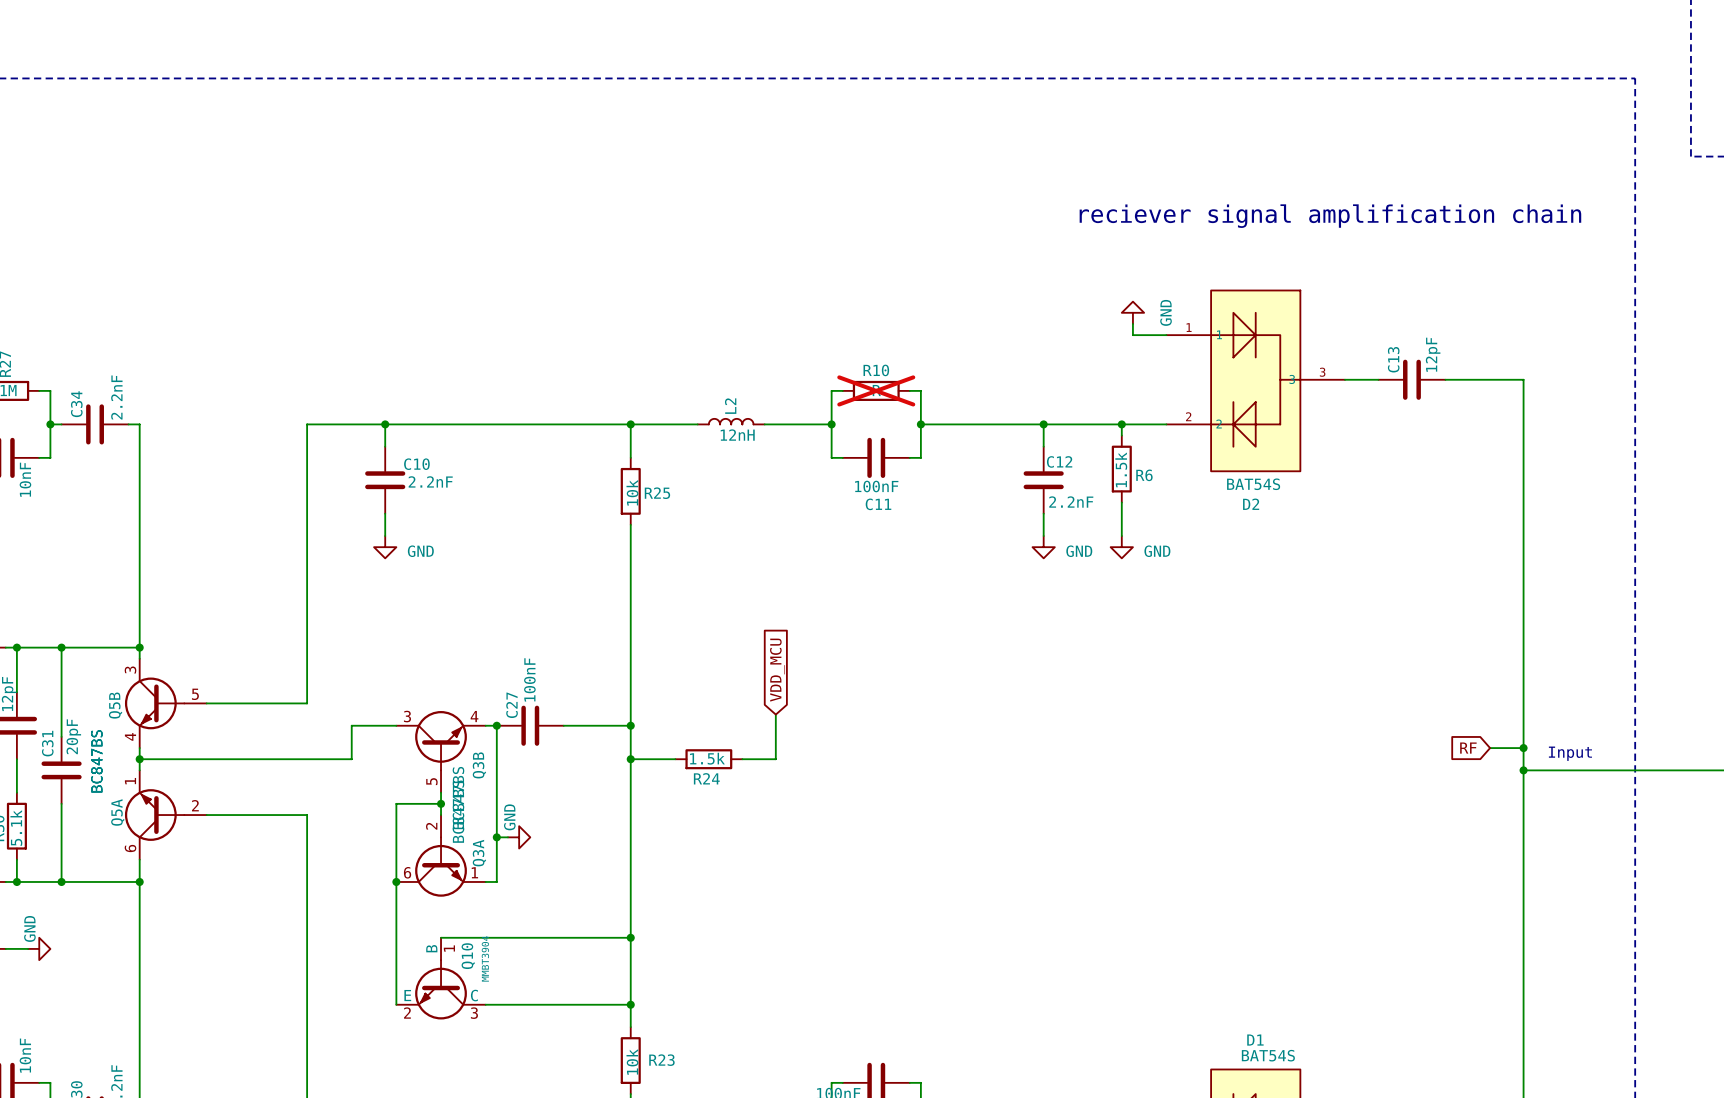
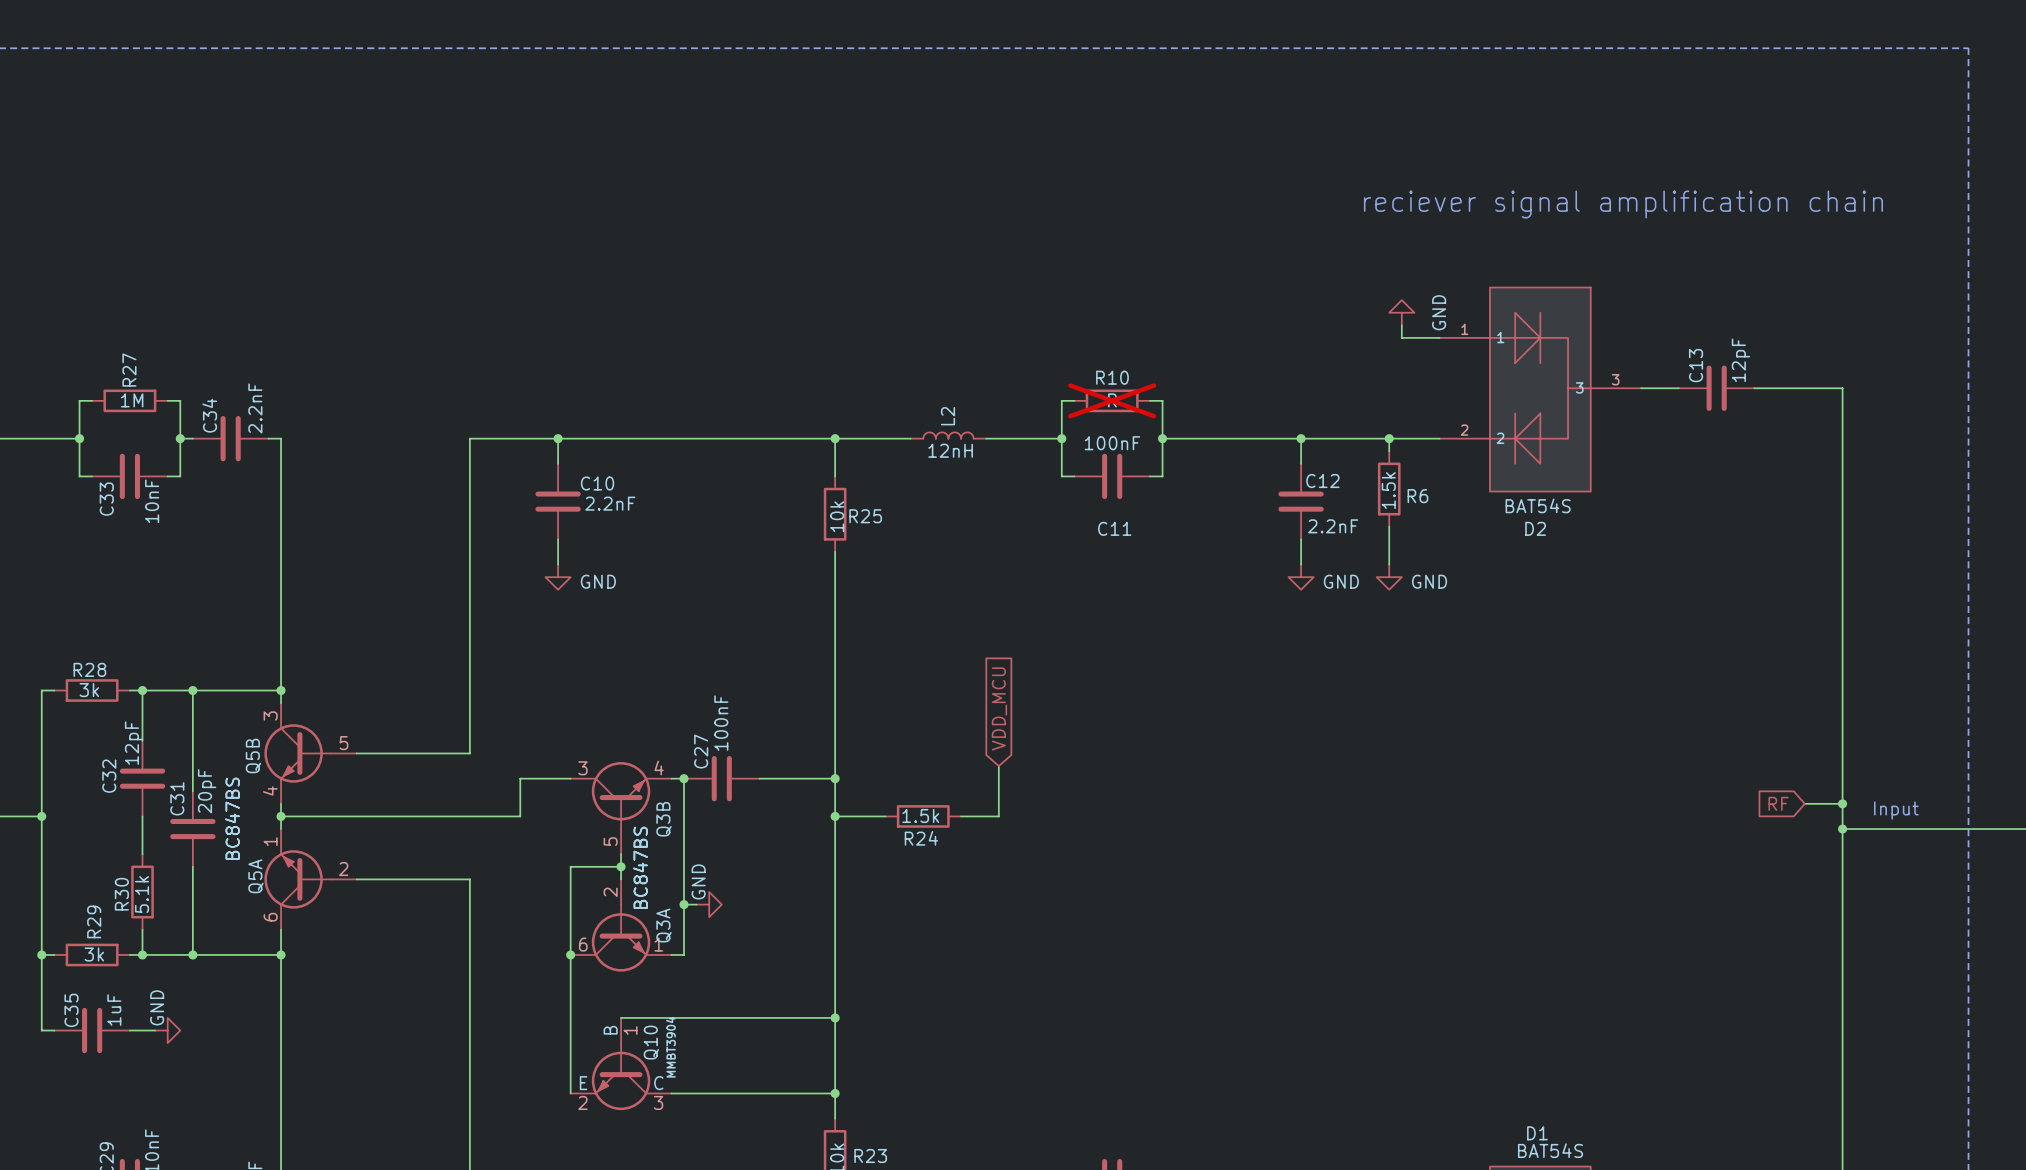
C11 value position: 100nF (876, 486) -> 100nF (1112, 443)

